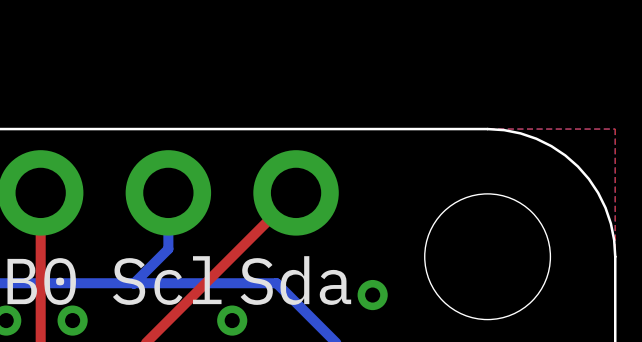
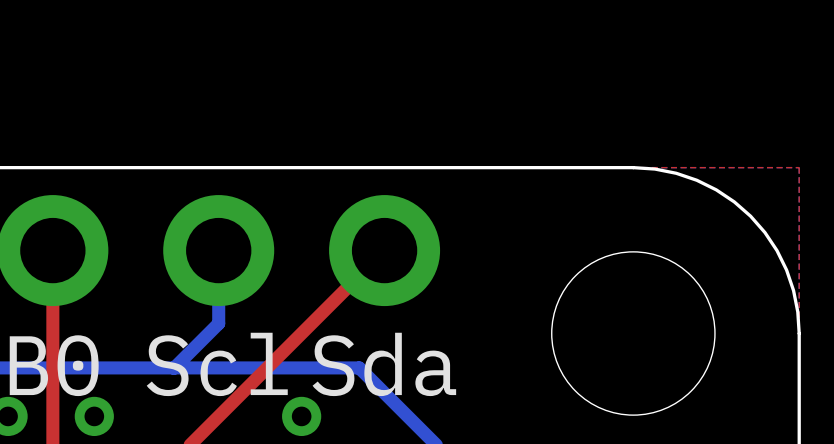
via: (372, 295) -> none

